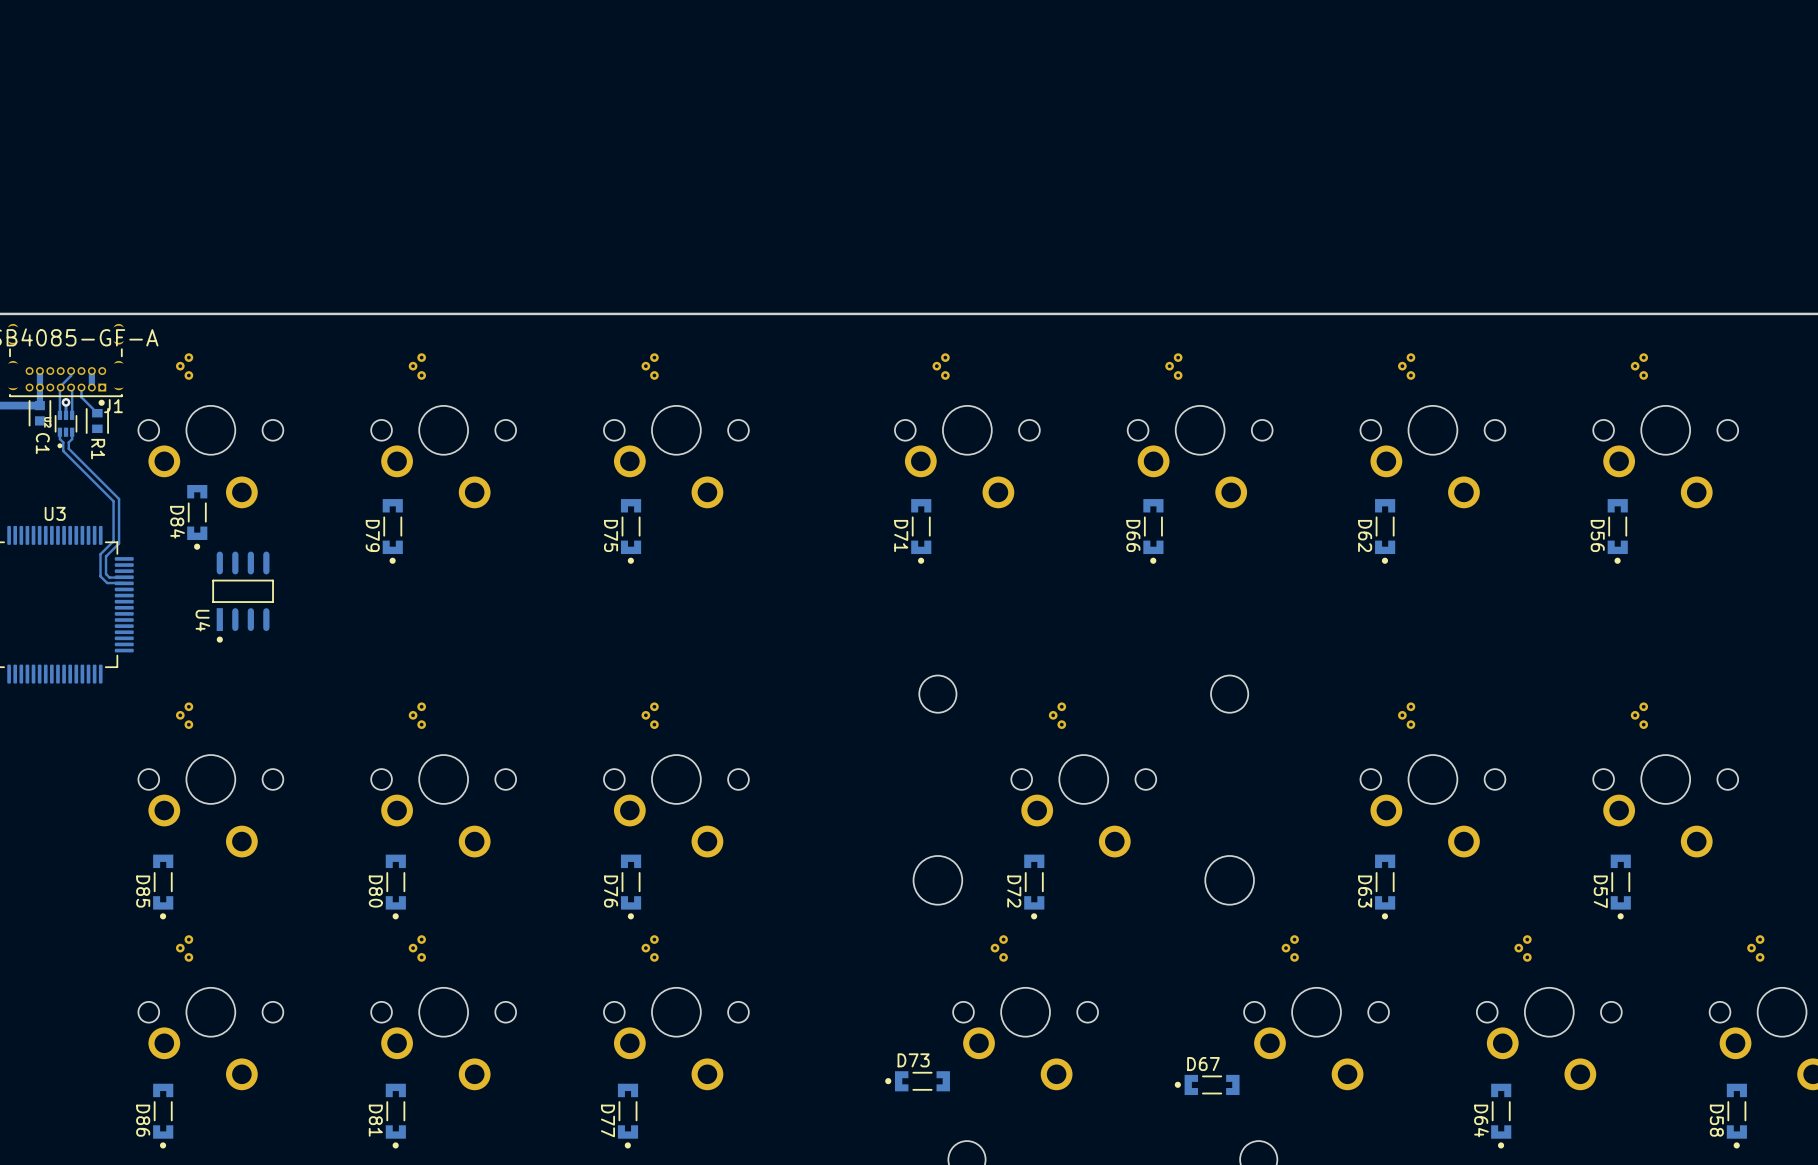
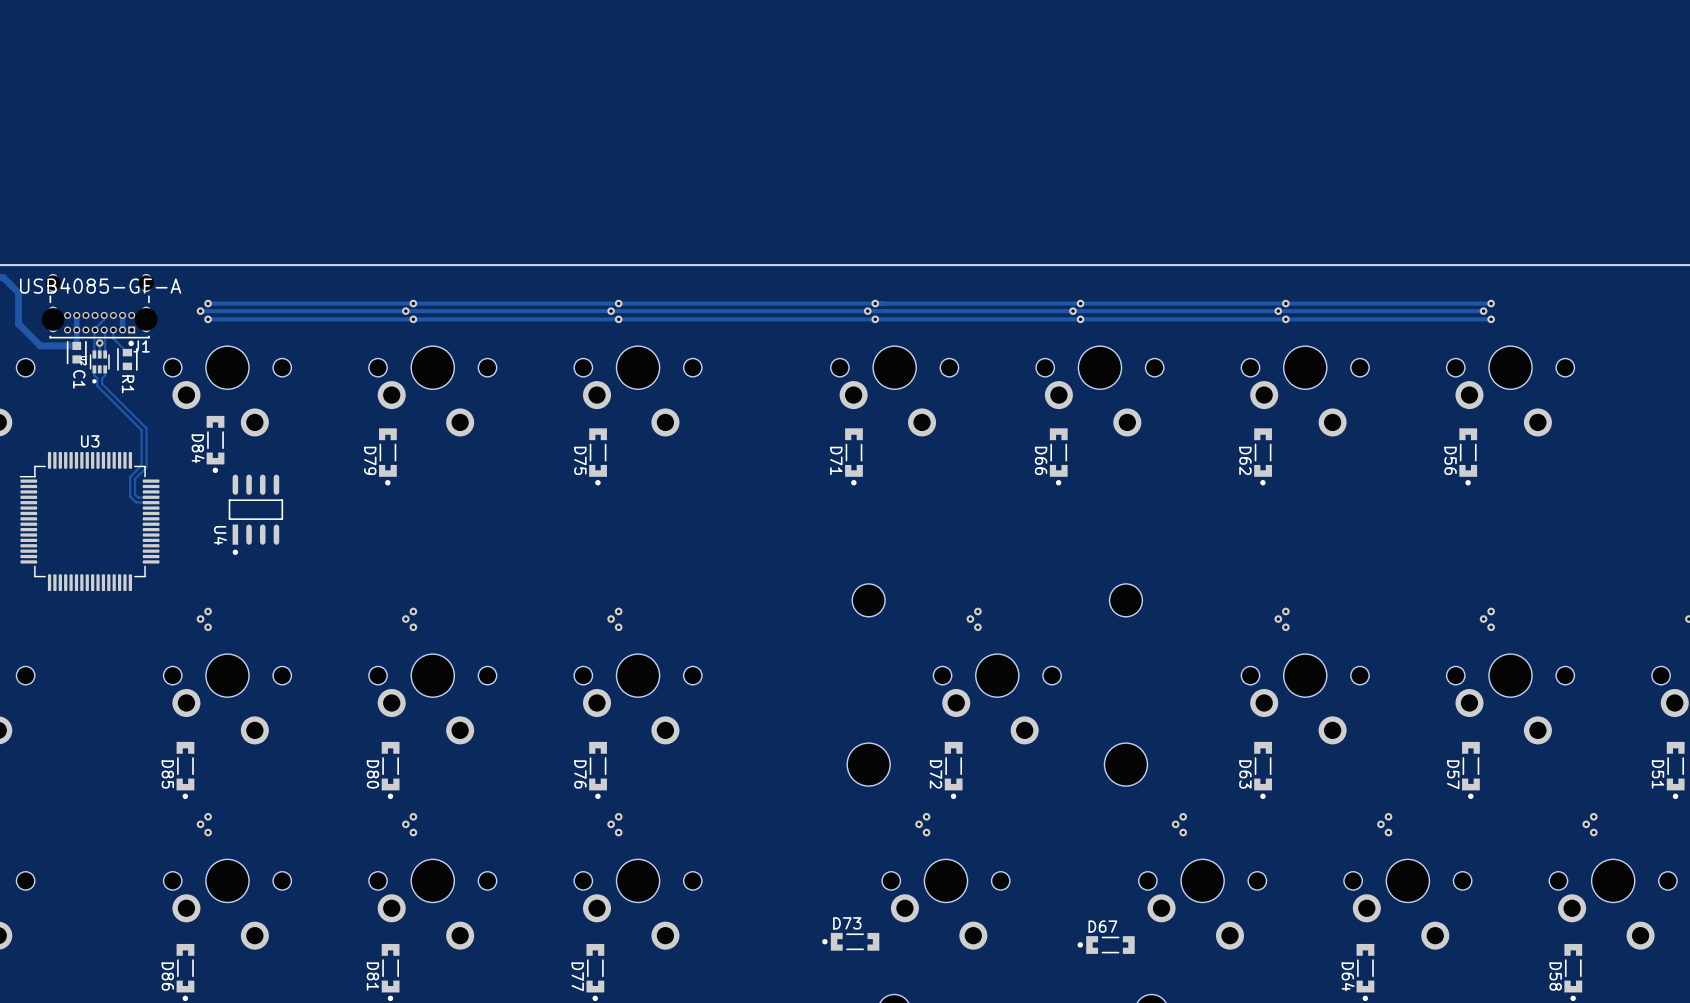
track: none -> (1491, 303) (208, 303)
track: none -> (1483, 311) (200, 311)
track: none -> (1491, 319) (208, 319)

